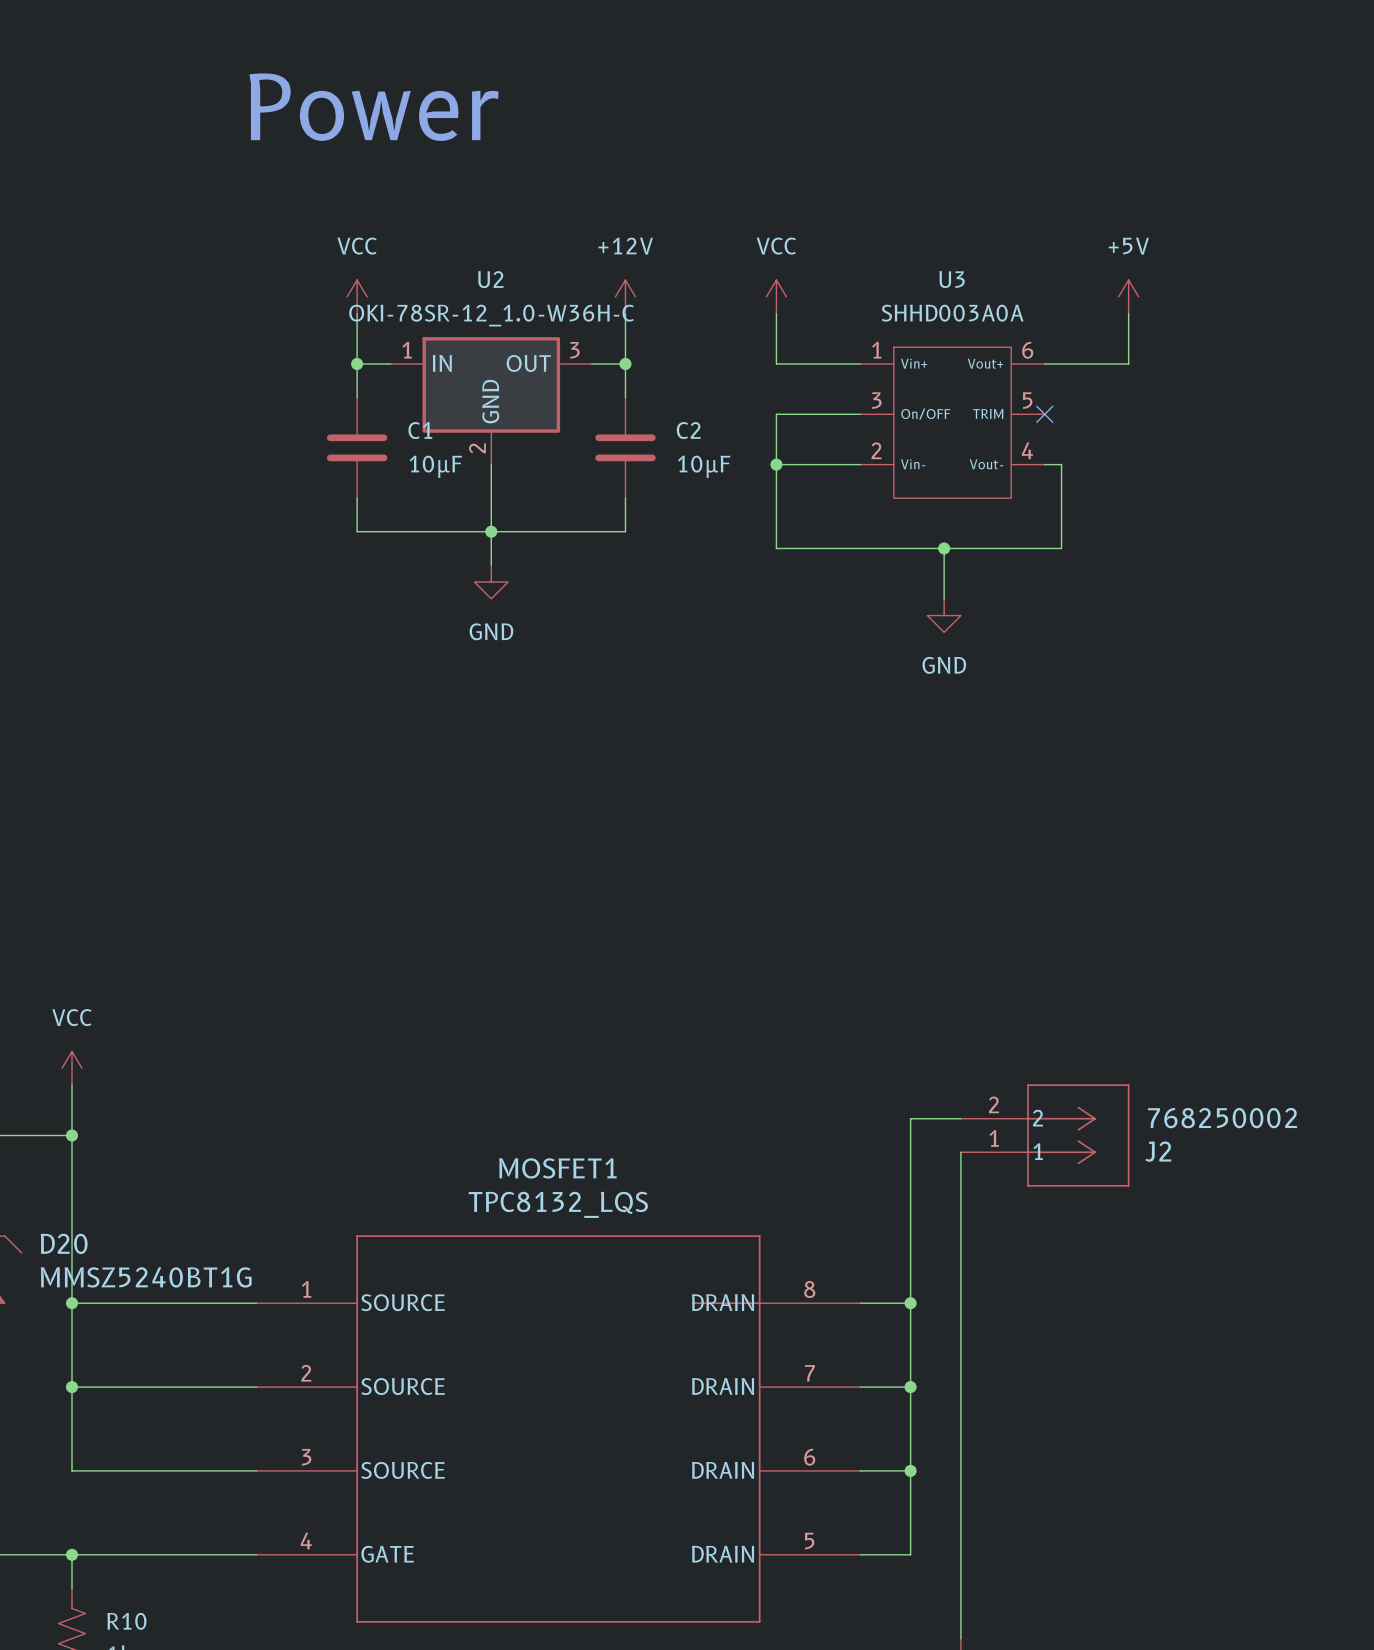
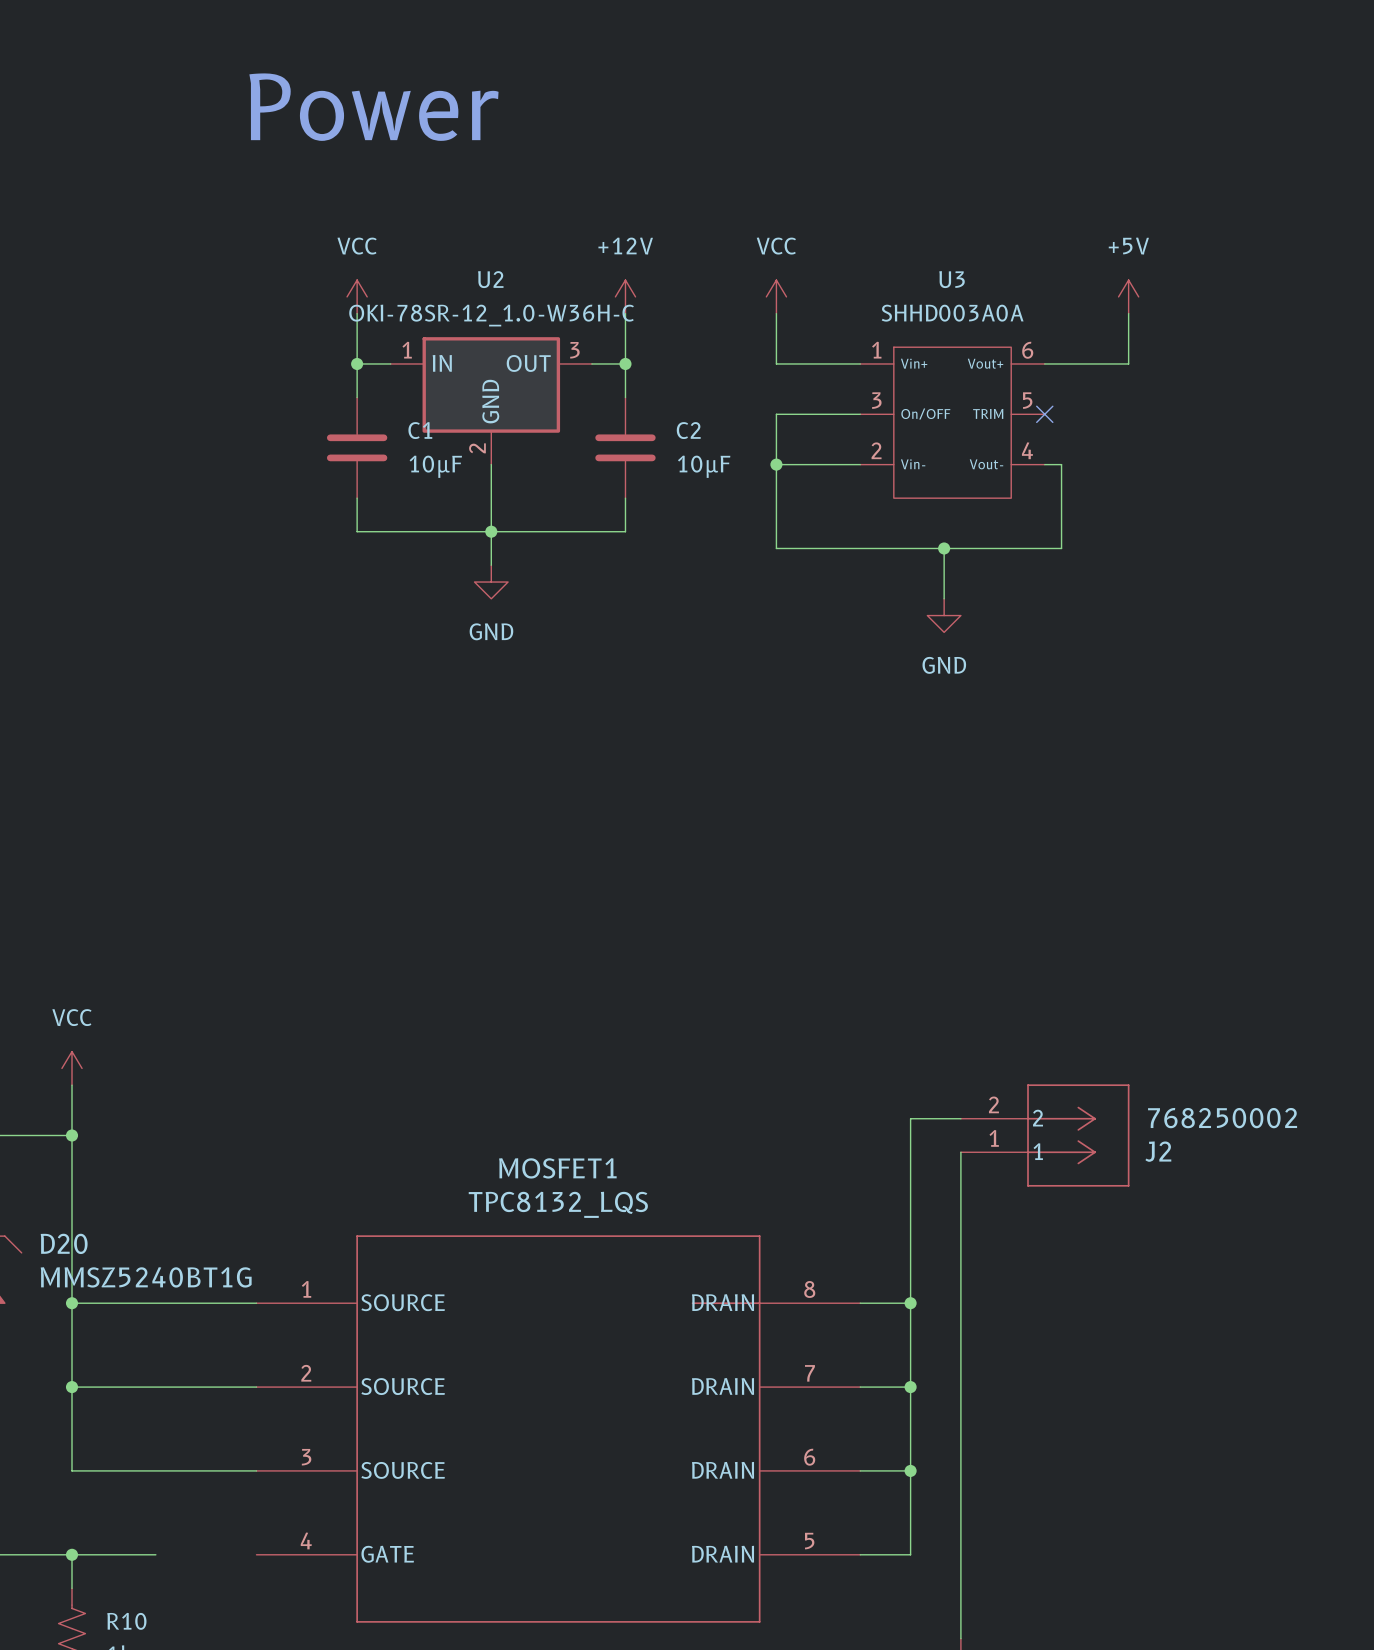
wire: (155, 1554) (256, 1554) -> none

